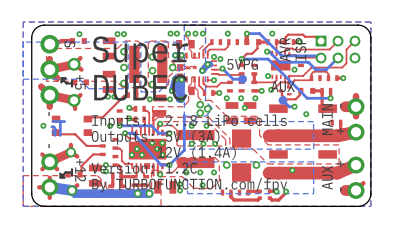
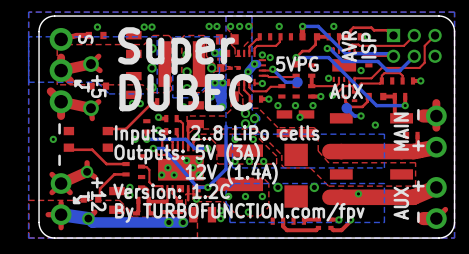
bottom track: (60, 121) (60, 135) -> none
bottom track: (64, 121) (52, 121) -> none
bottom track: (51, 126) (54, 128) (55, 135) -> none
bottom track: (55, 132) (52, 132) -> none

